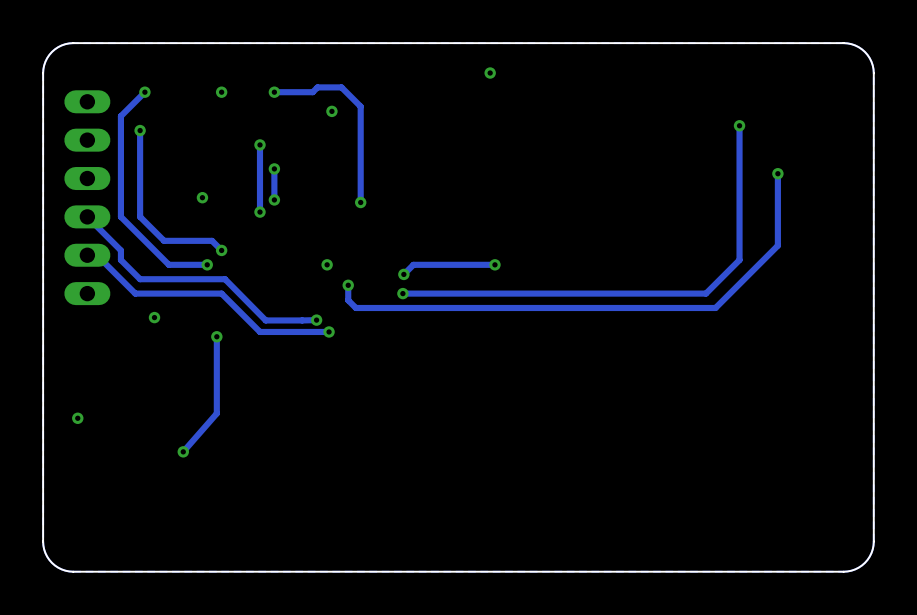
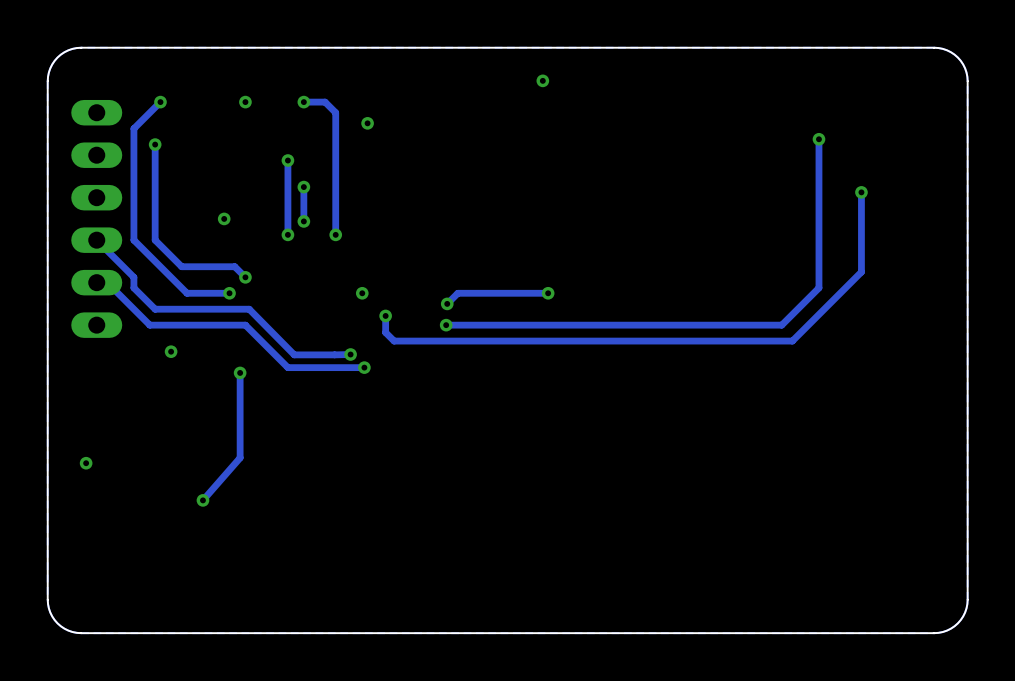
track: (293, 92) (312, 92) (317, 87) (341, 87) (360, 106) (360, 202) -> (325, 102) (335, 112) (335, 234)
via position: (360, 202) -> (335, 234)

